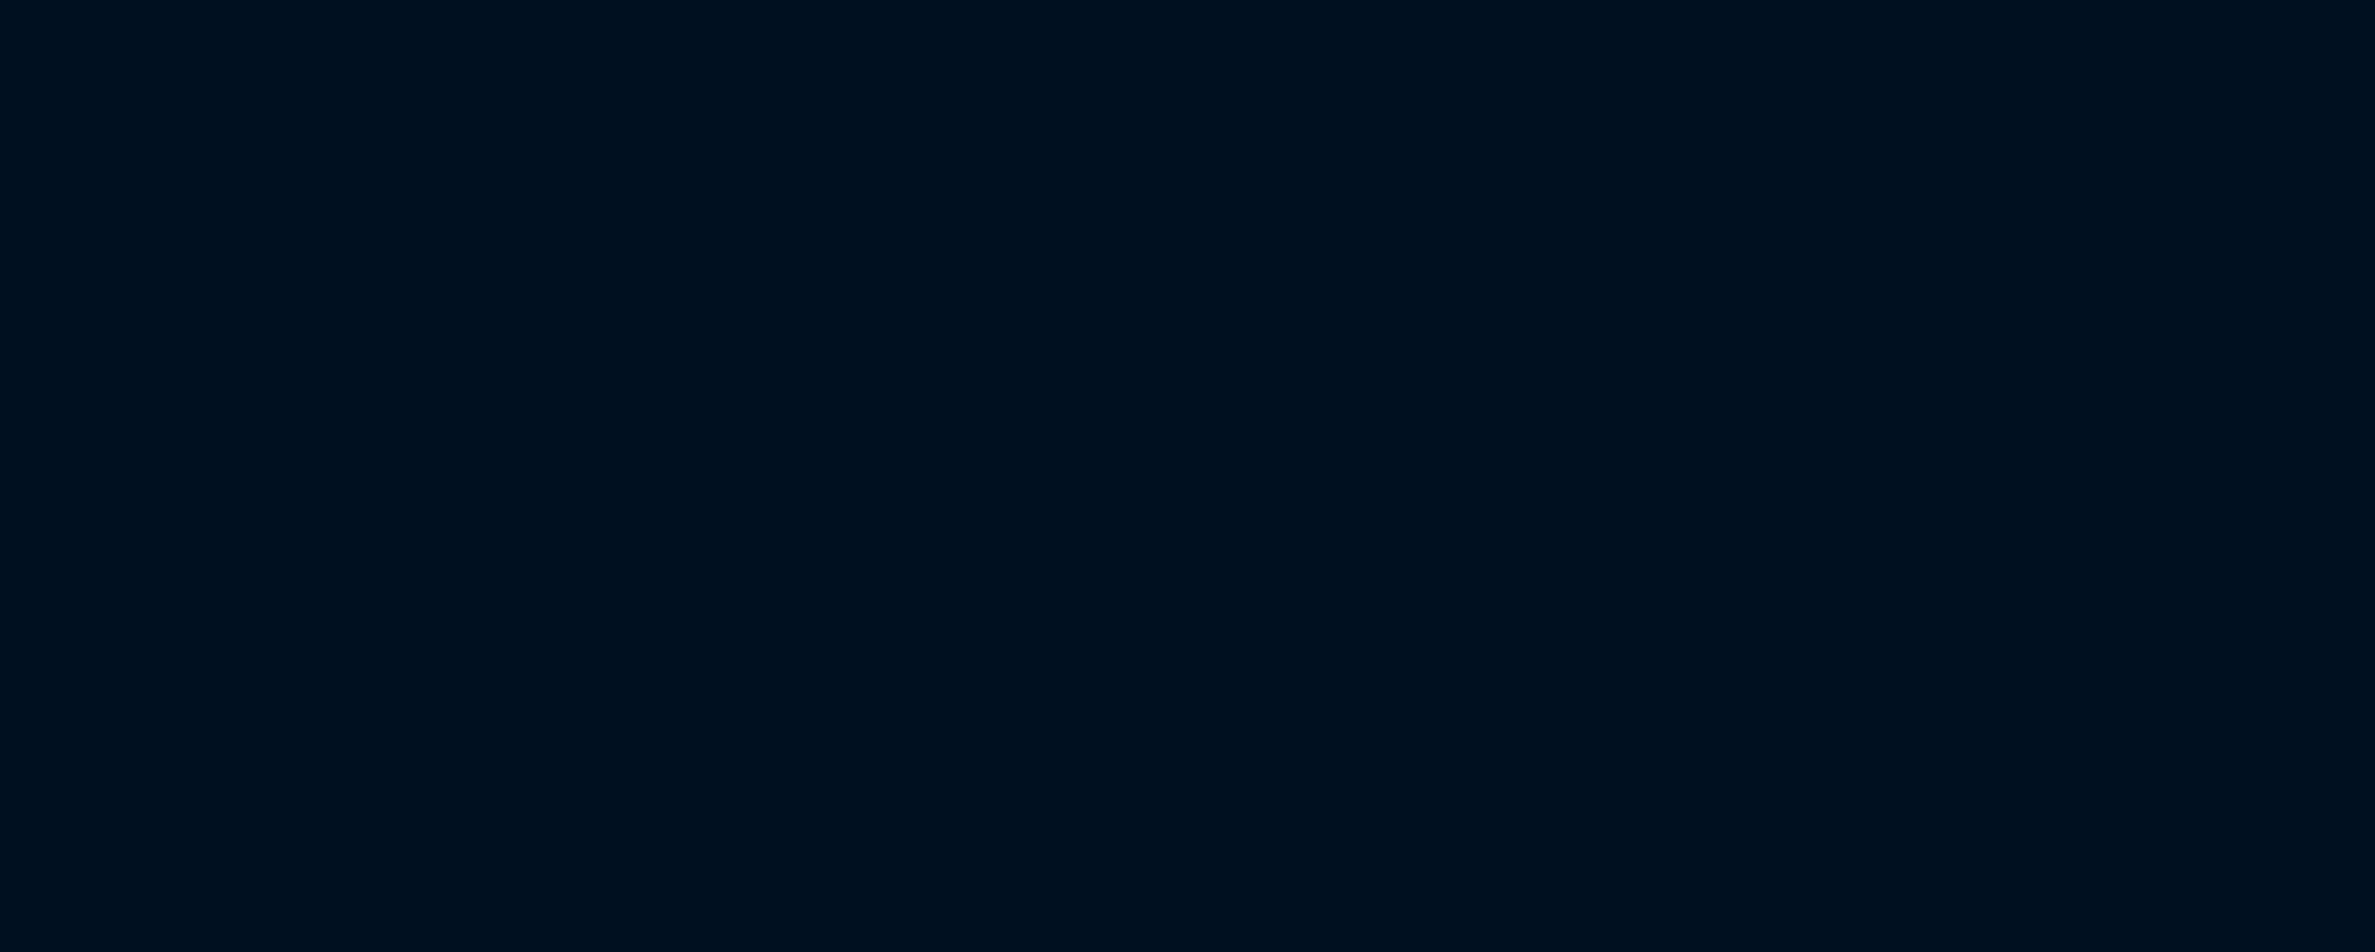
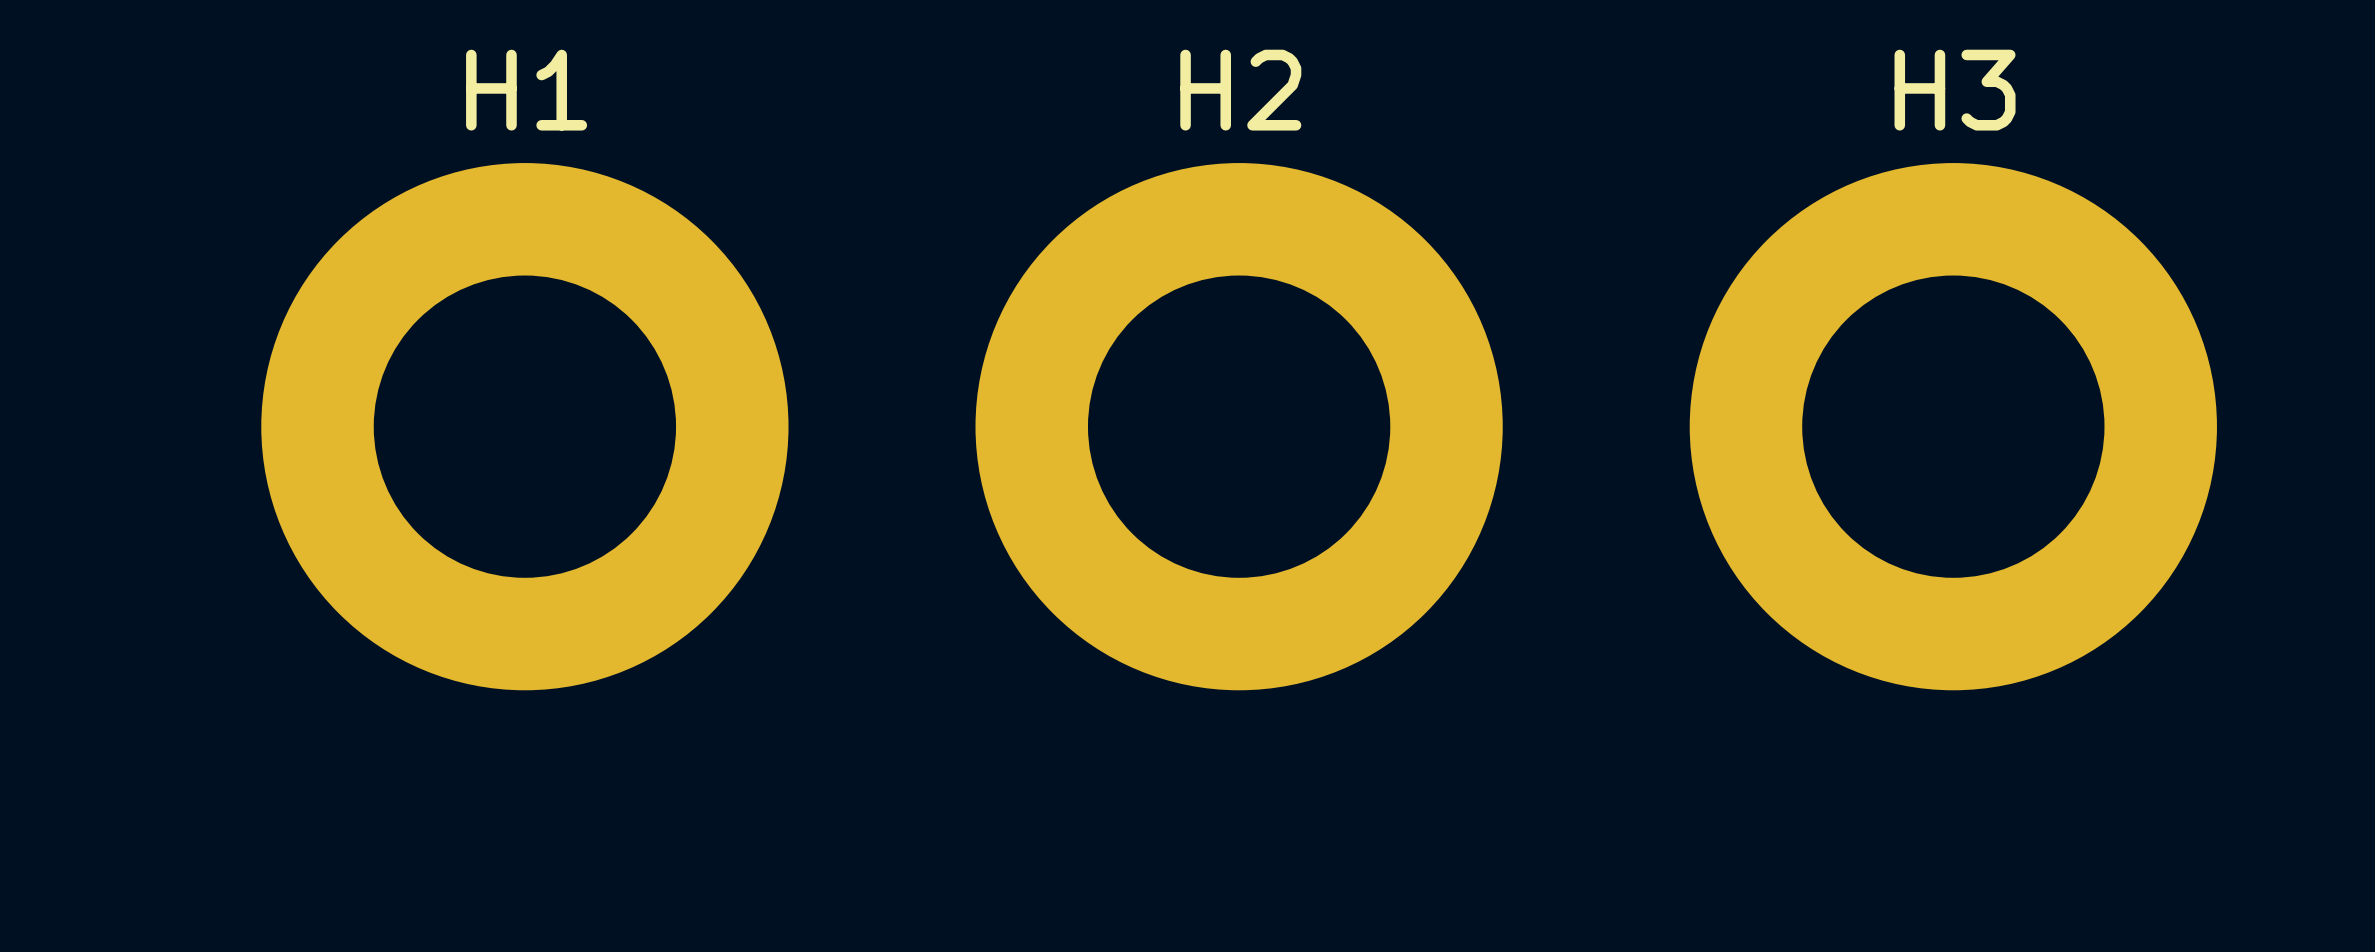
H1: none -> (524, 426)
H2: none -> (1239, 426)
H3: none -> (1953, 426)

